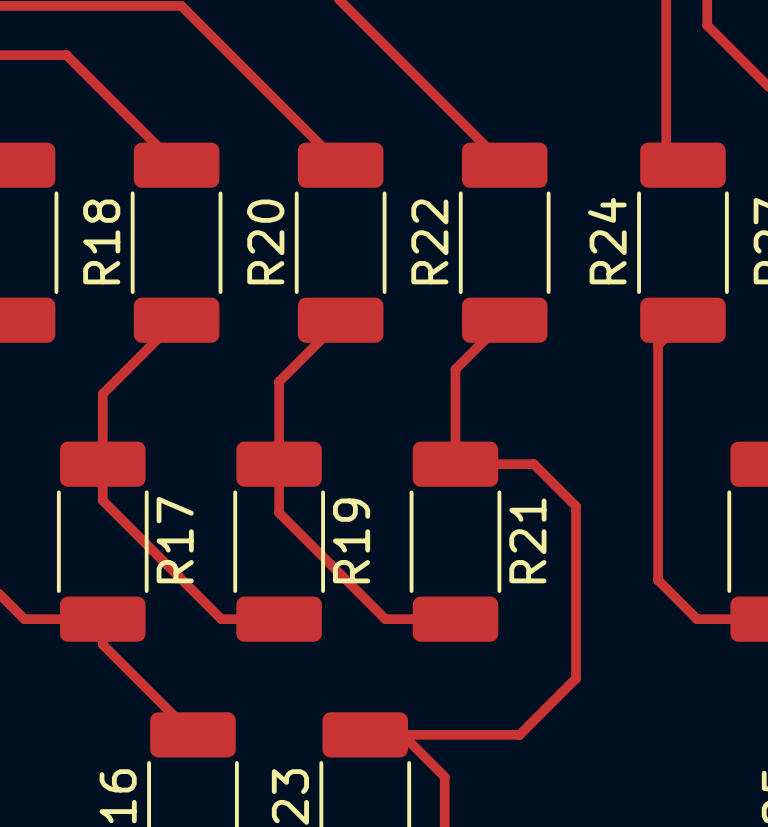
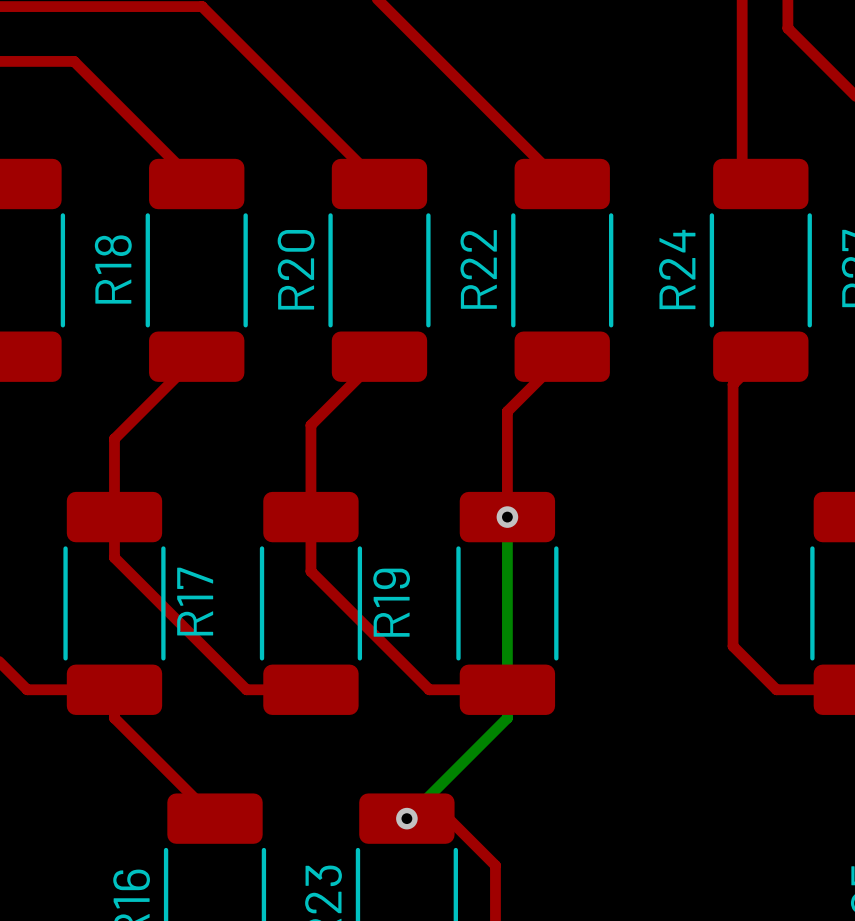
bottom track: none -> (507, 517) (507, 718) (406, 818)
top track: (455, 464) (533, 464) (576, 506) (576, 678) (519, 734) (402, 734) -> none
via: none -> (507, 517)
R21 name: R21 (527, 540) -> none
via: none -> (406, 818)

